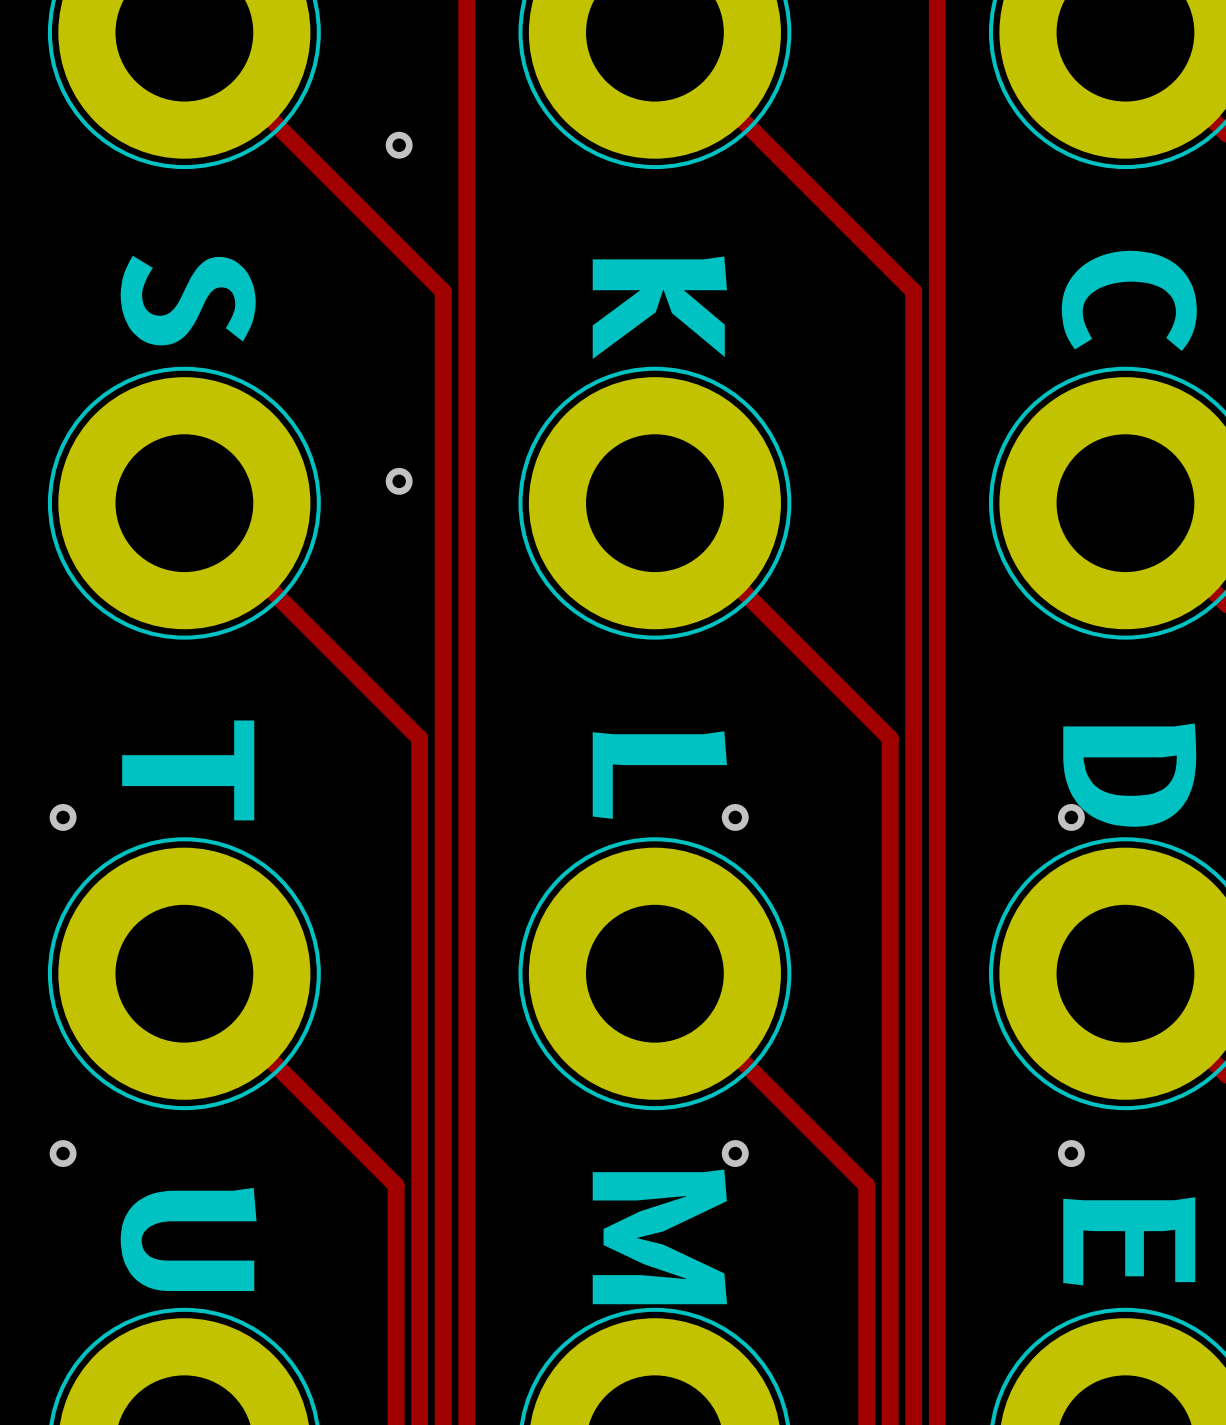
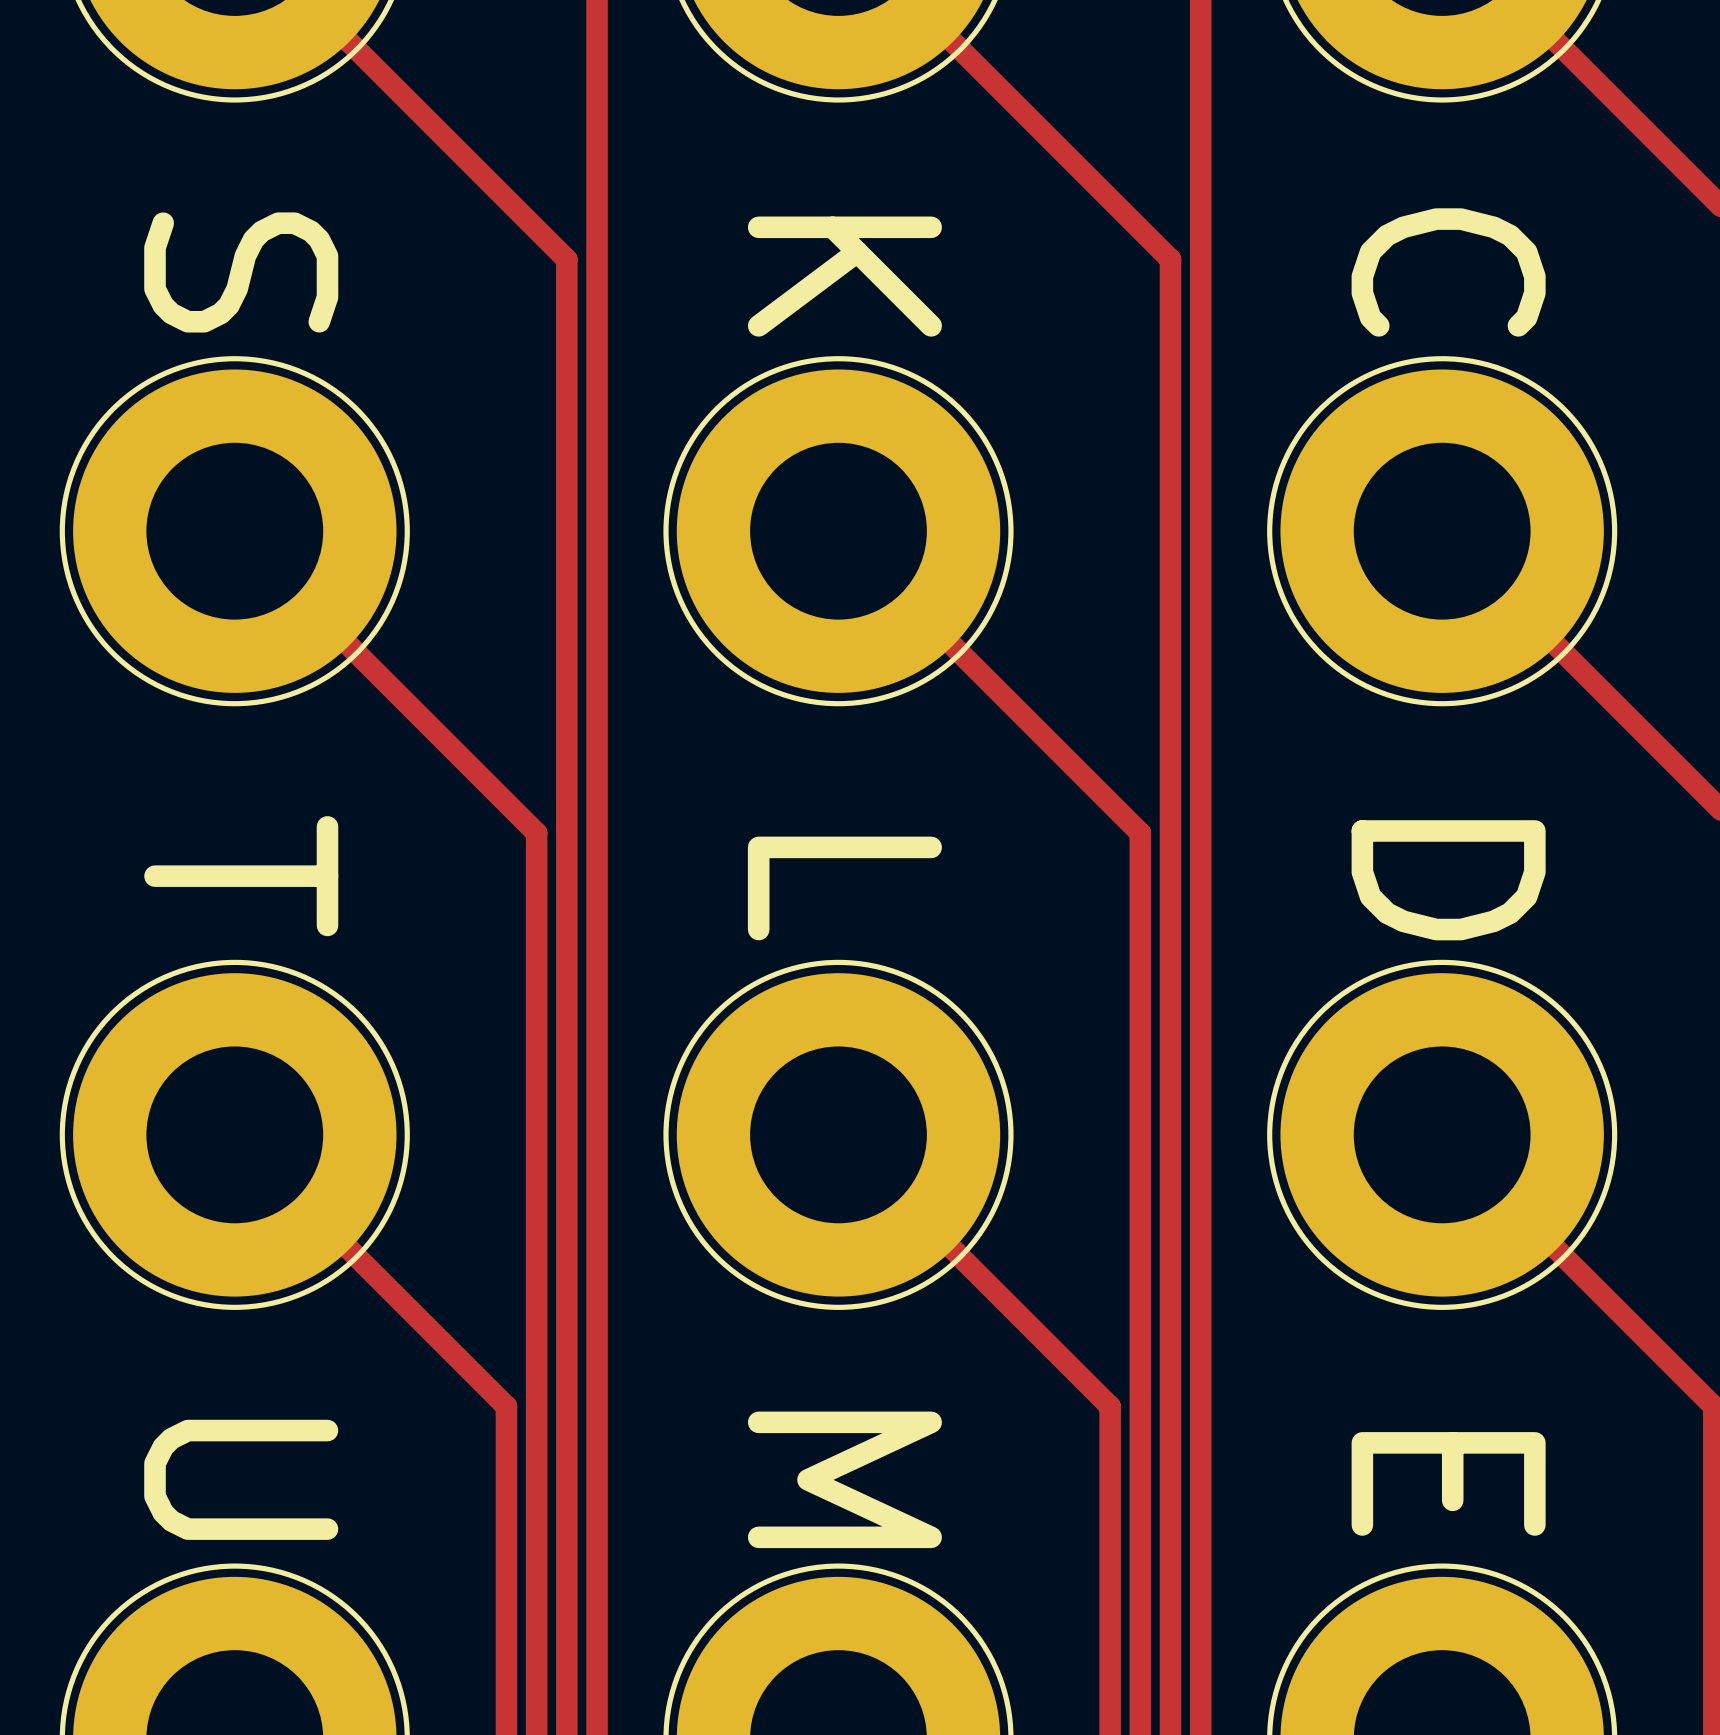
via: (399, 145) -> none
via: (399, 481) -> none
via: (63, 817) -> none
via: (735, 817) -> none
via: (1071, 817) -> none
via: (63, 1153) -> none
via: (735, 1153) -> none
via: (1071, 1153) -> none

